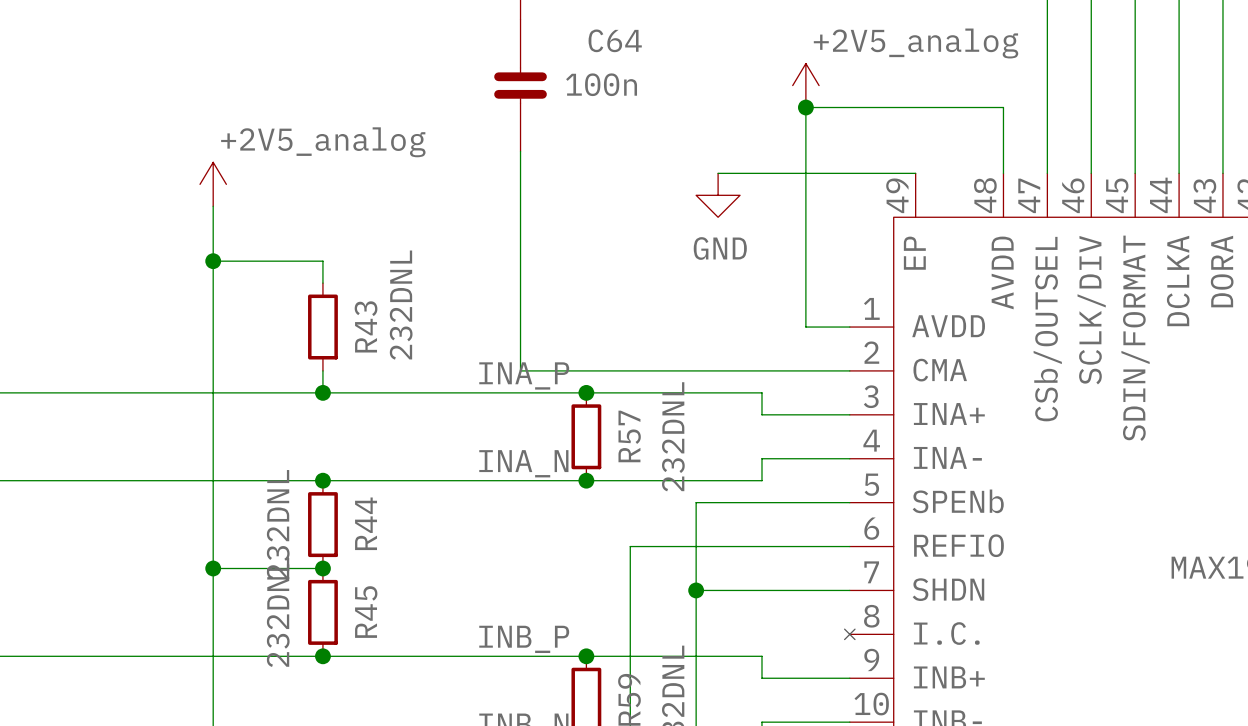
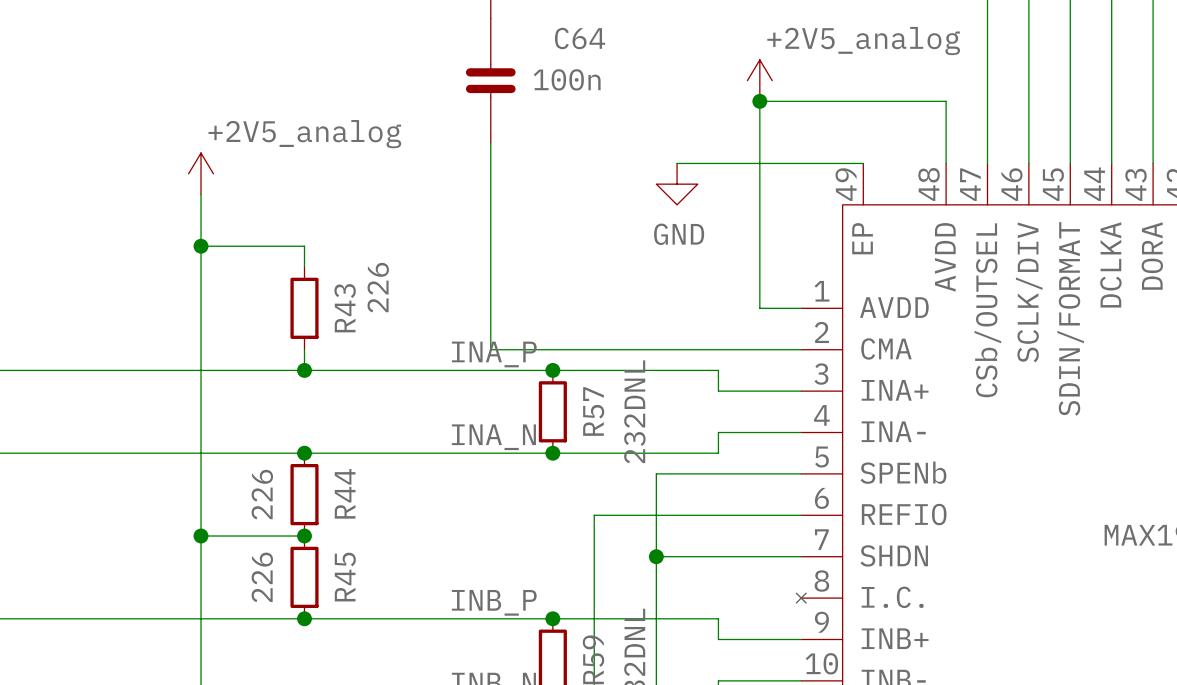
R43 value: 232DNL (401, 305) -> 226 (378, 287)
R44 value: 232DNL (278, 524) -> 226 (262, 494)
R45 value: 232DNL (278, 612) -> 226 (262, 577)

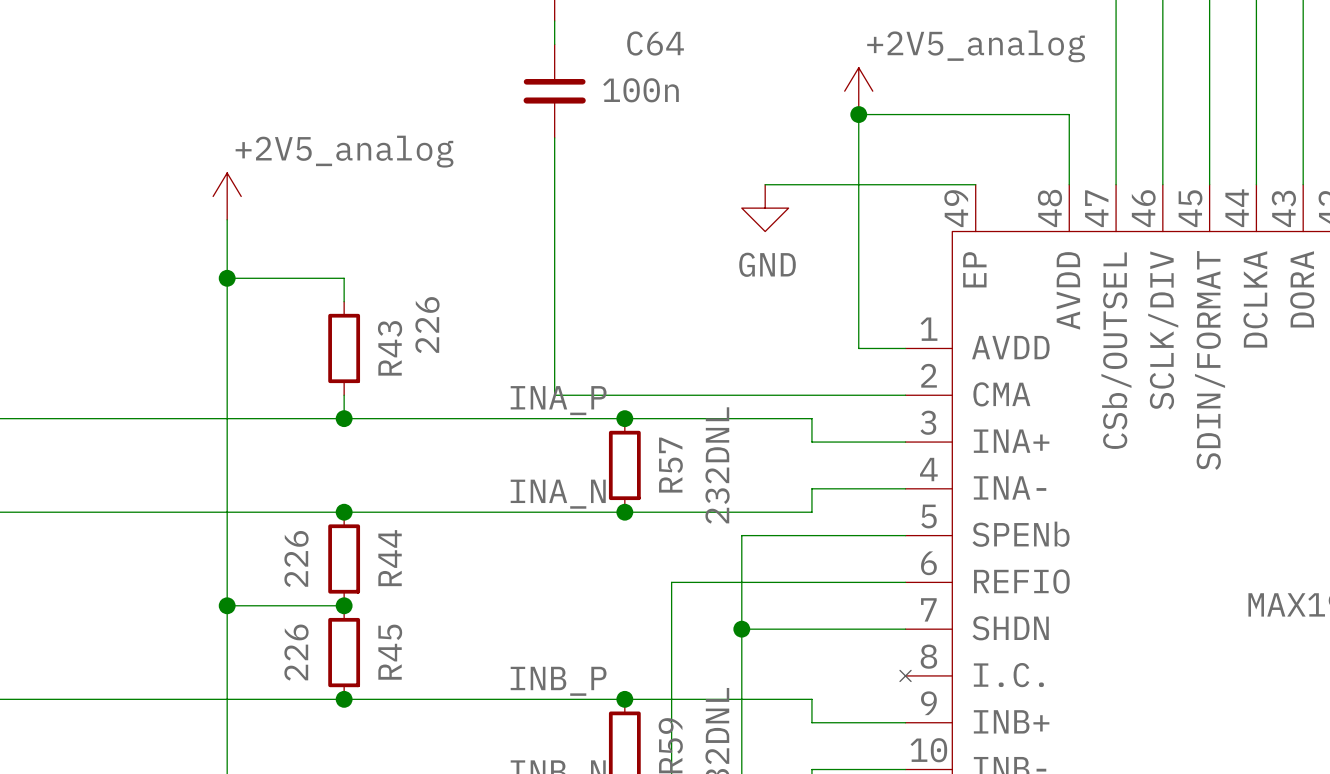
C64 symbol: [465, 18, 516, 143] -> [523, 44, 586, 138]

